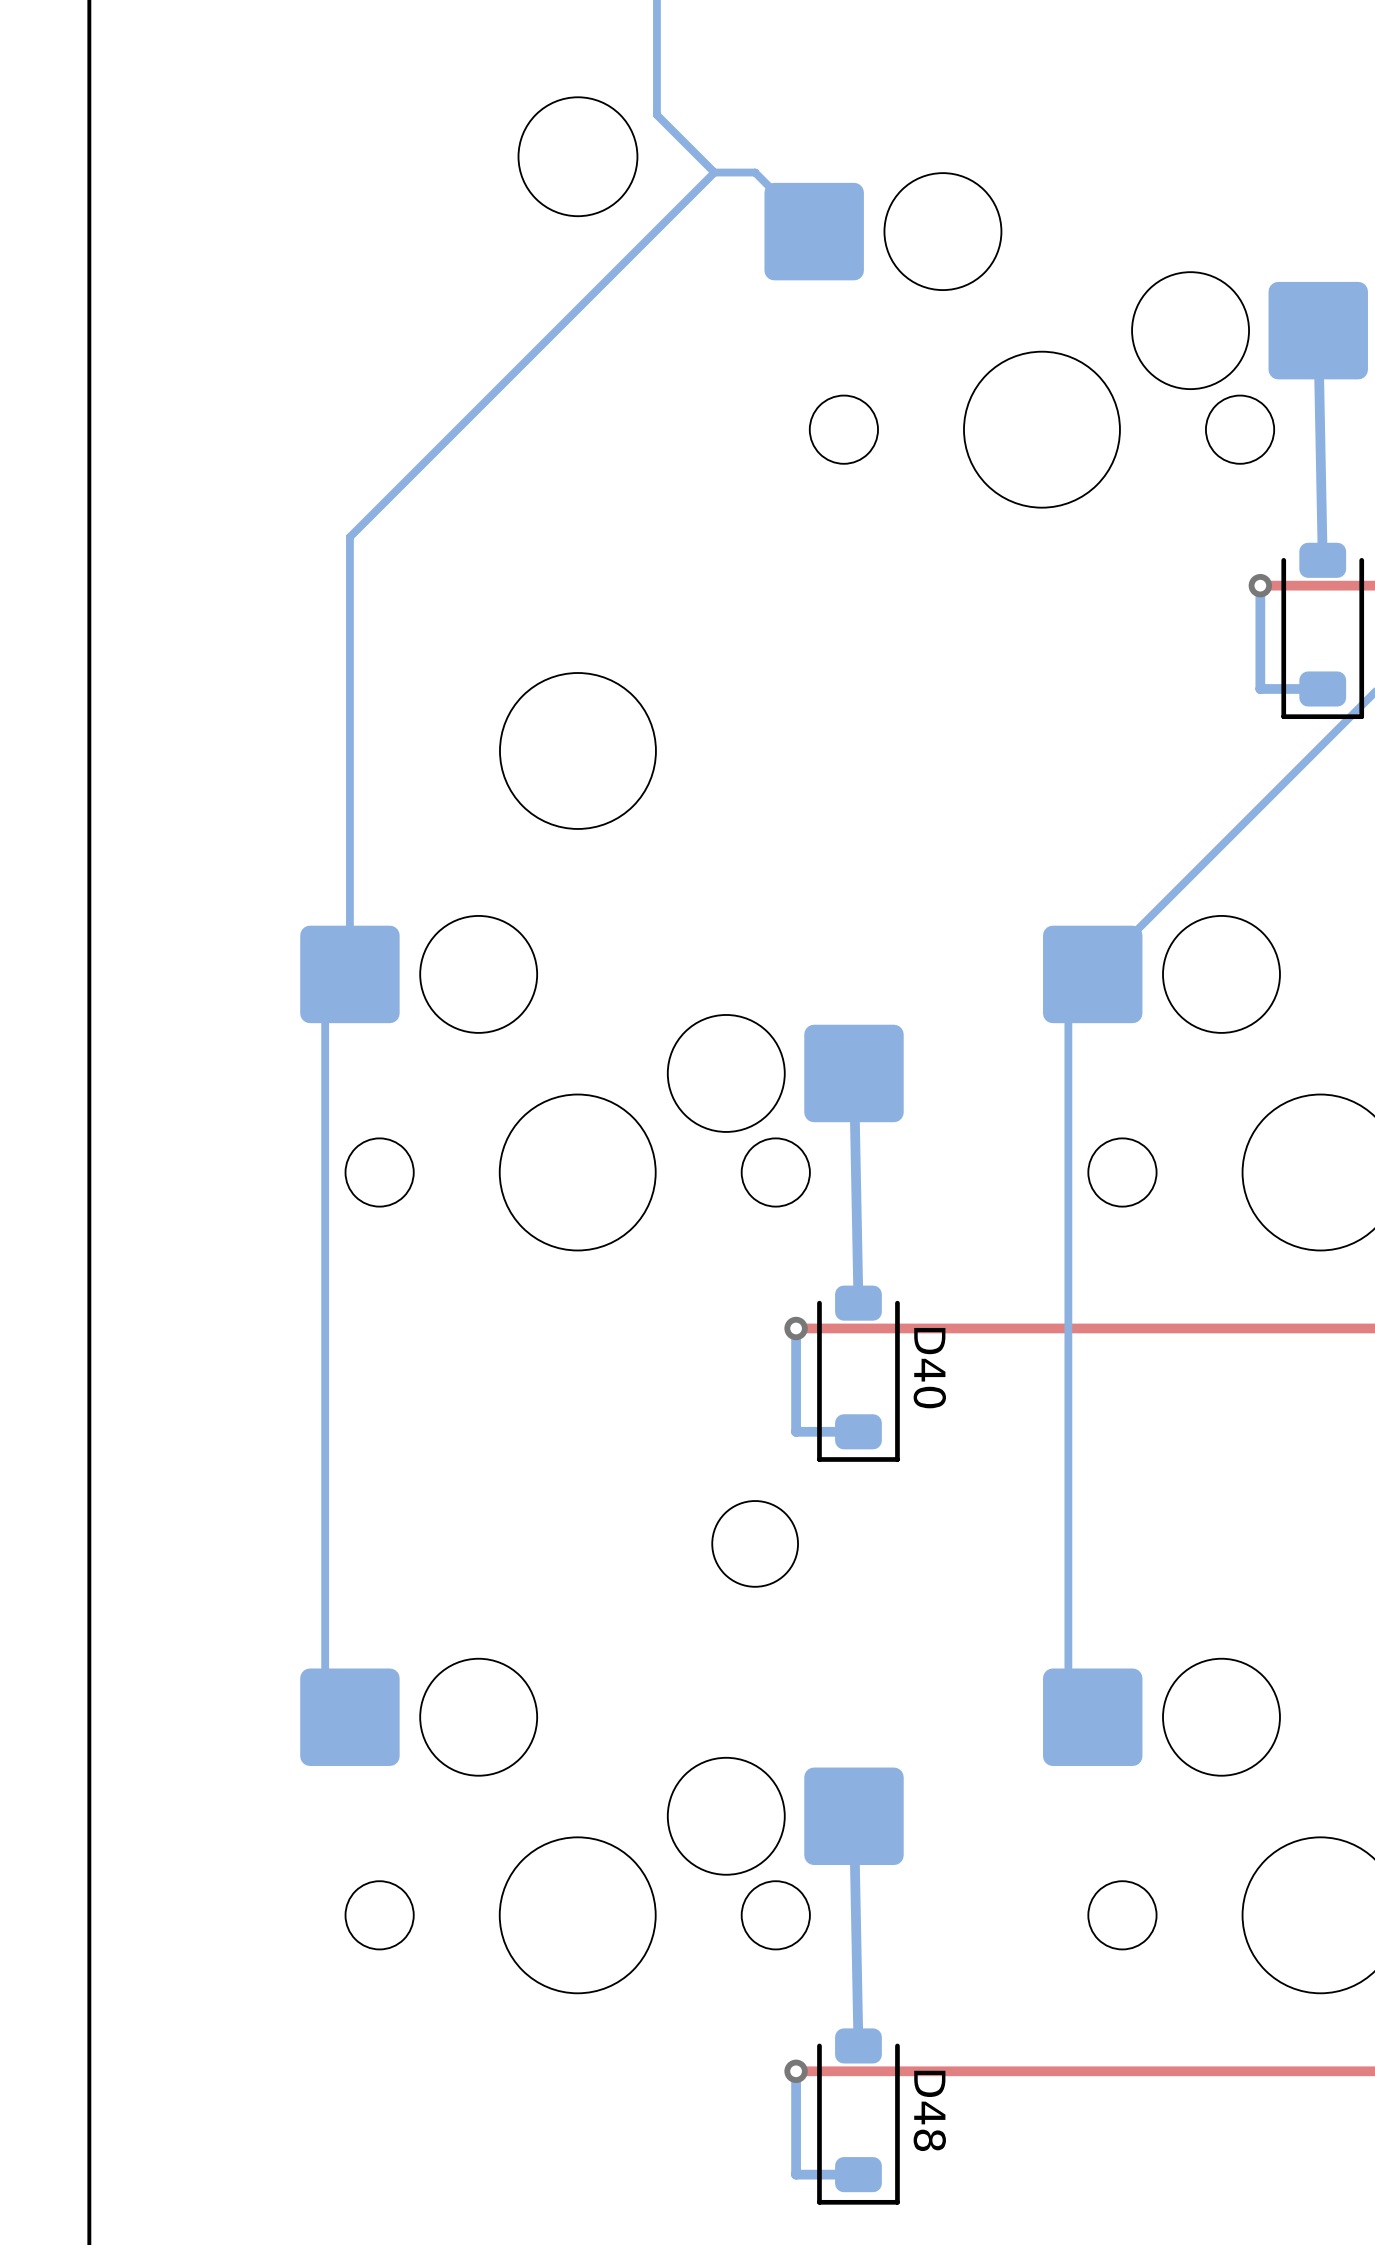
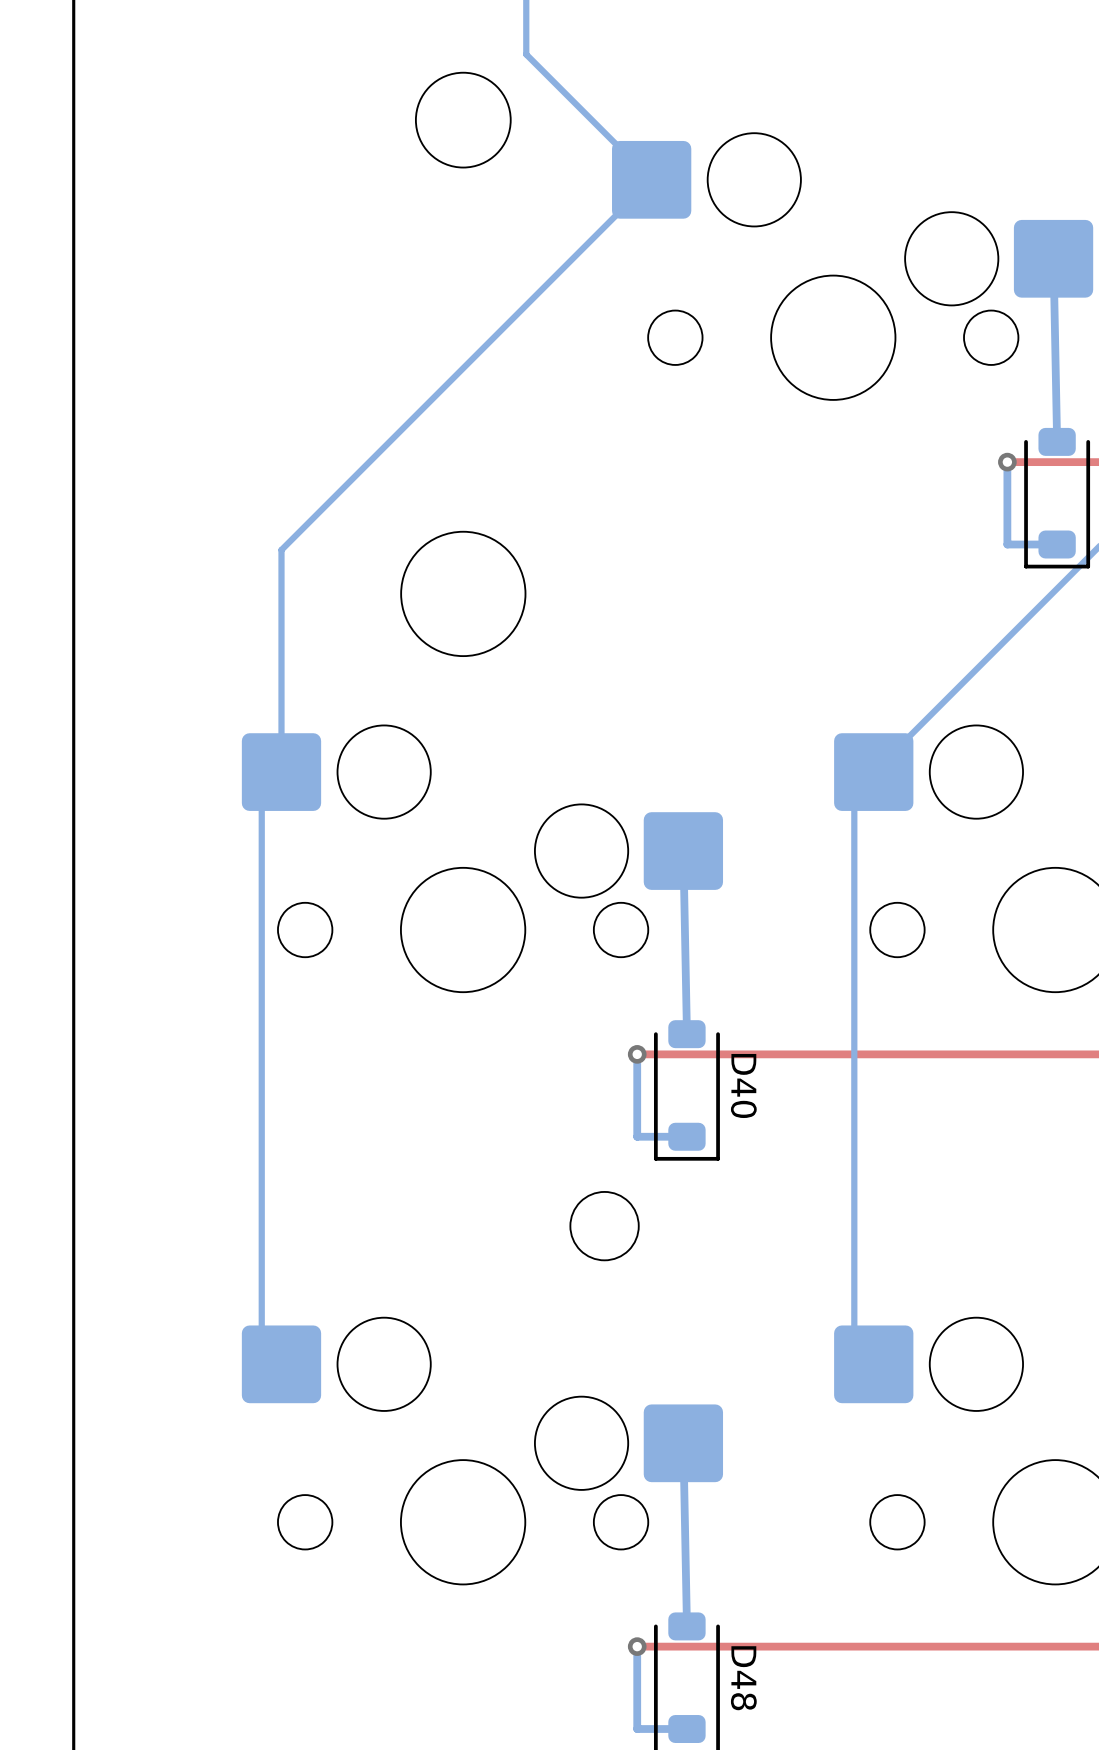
bottom track: (656, 74) (656, 114) (714, 172) -> (526, 54) (604, 132)
bottom track: (714, 172) (349, 537) (349, 695) -> (651, 179) (281, 549)
bottom track: (755, 172) (714, 172) -> none

